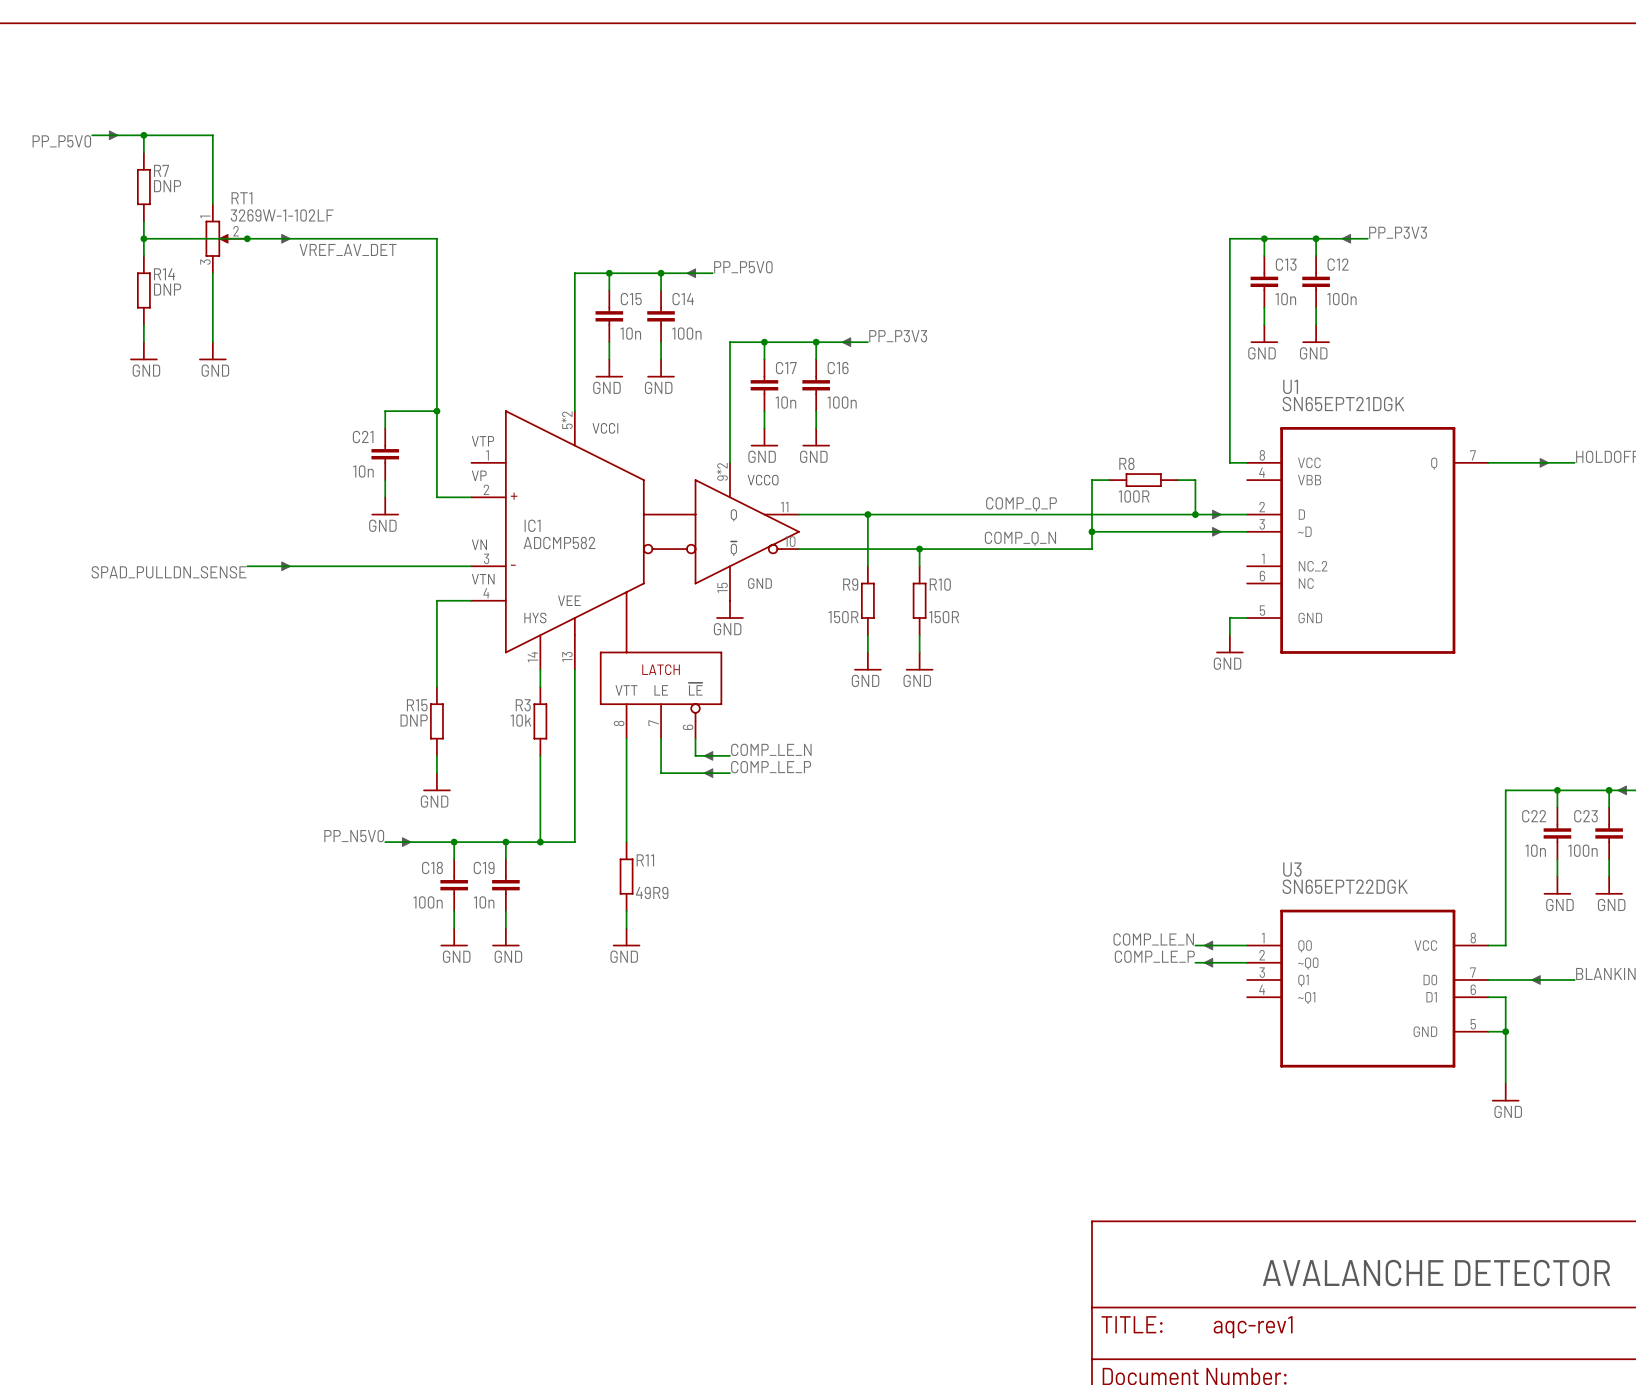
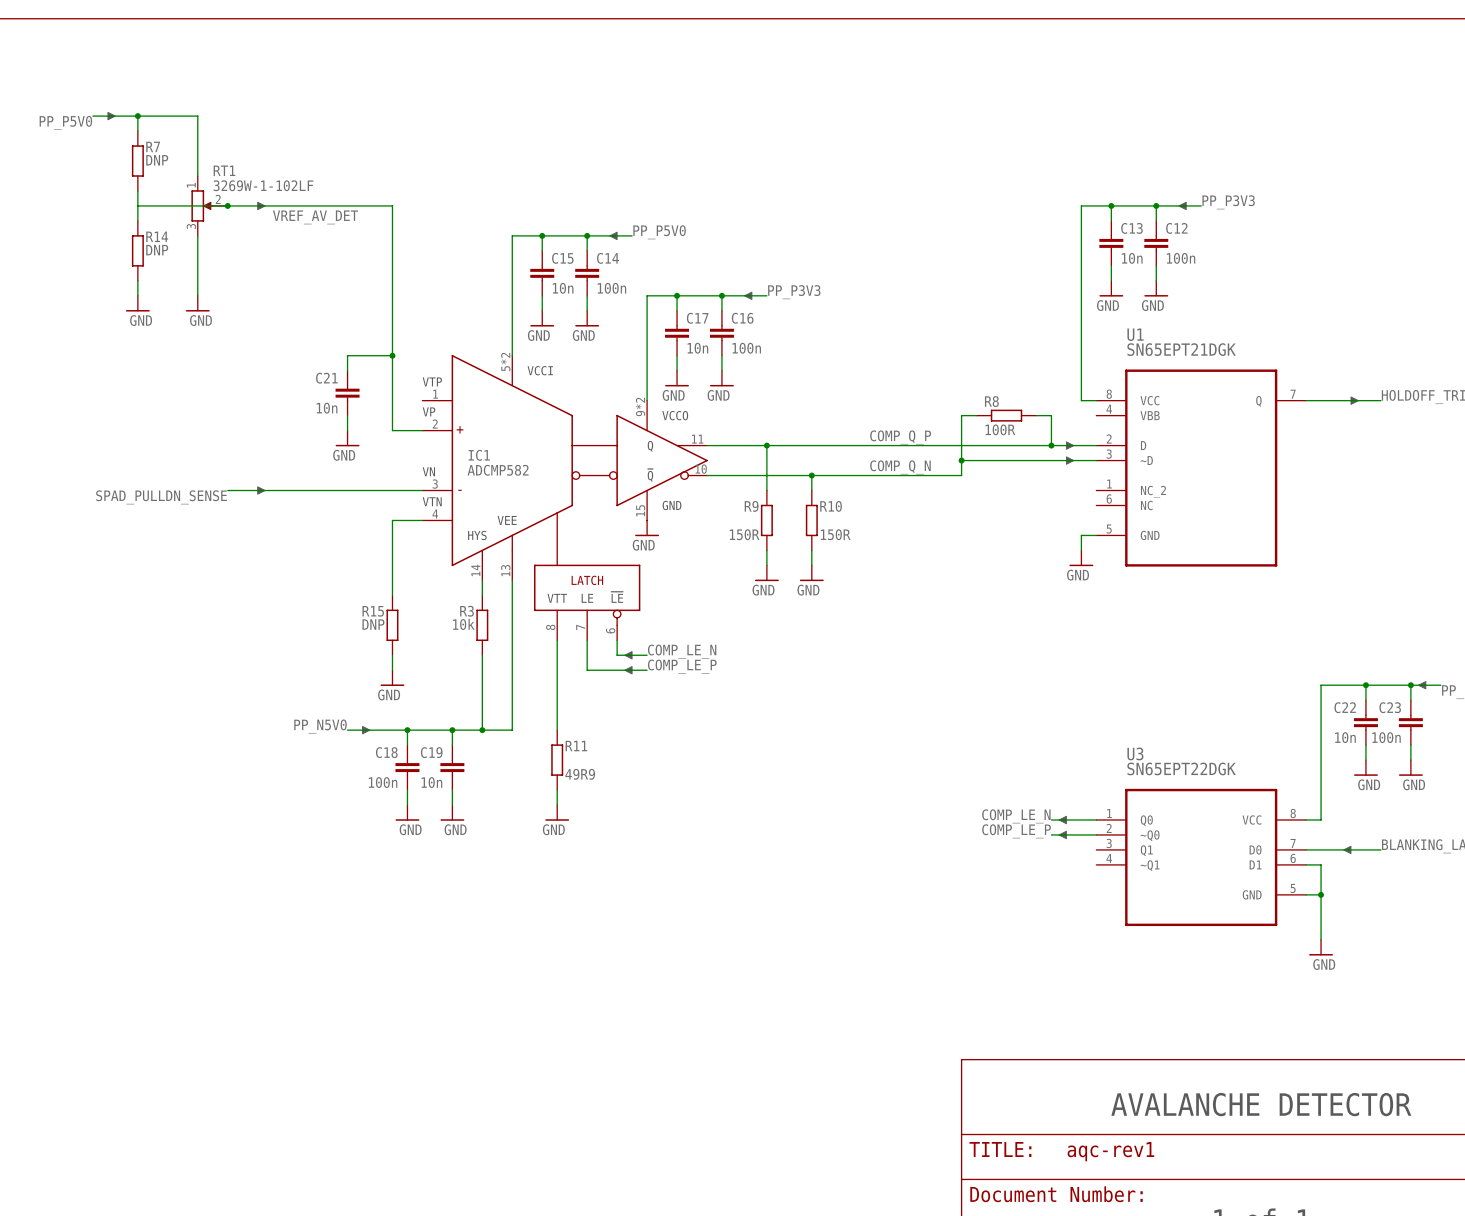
junction: (143, 238) -> none

